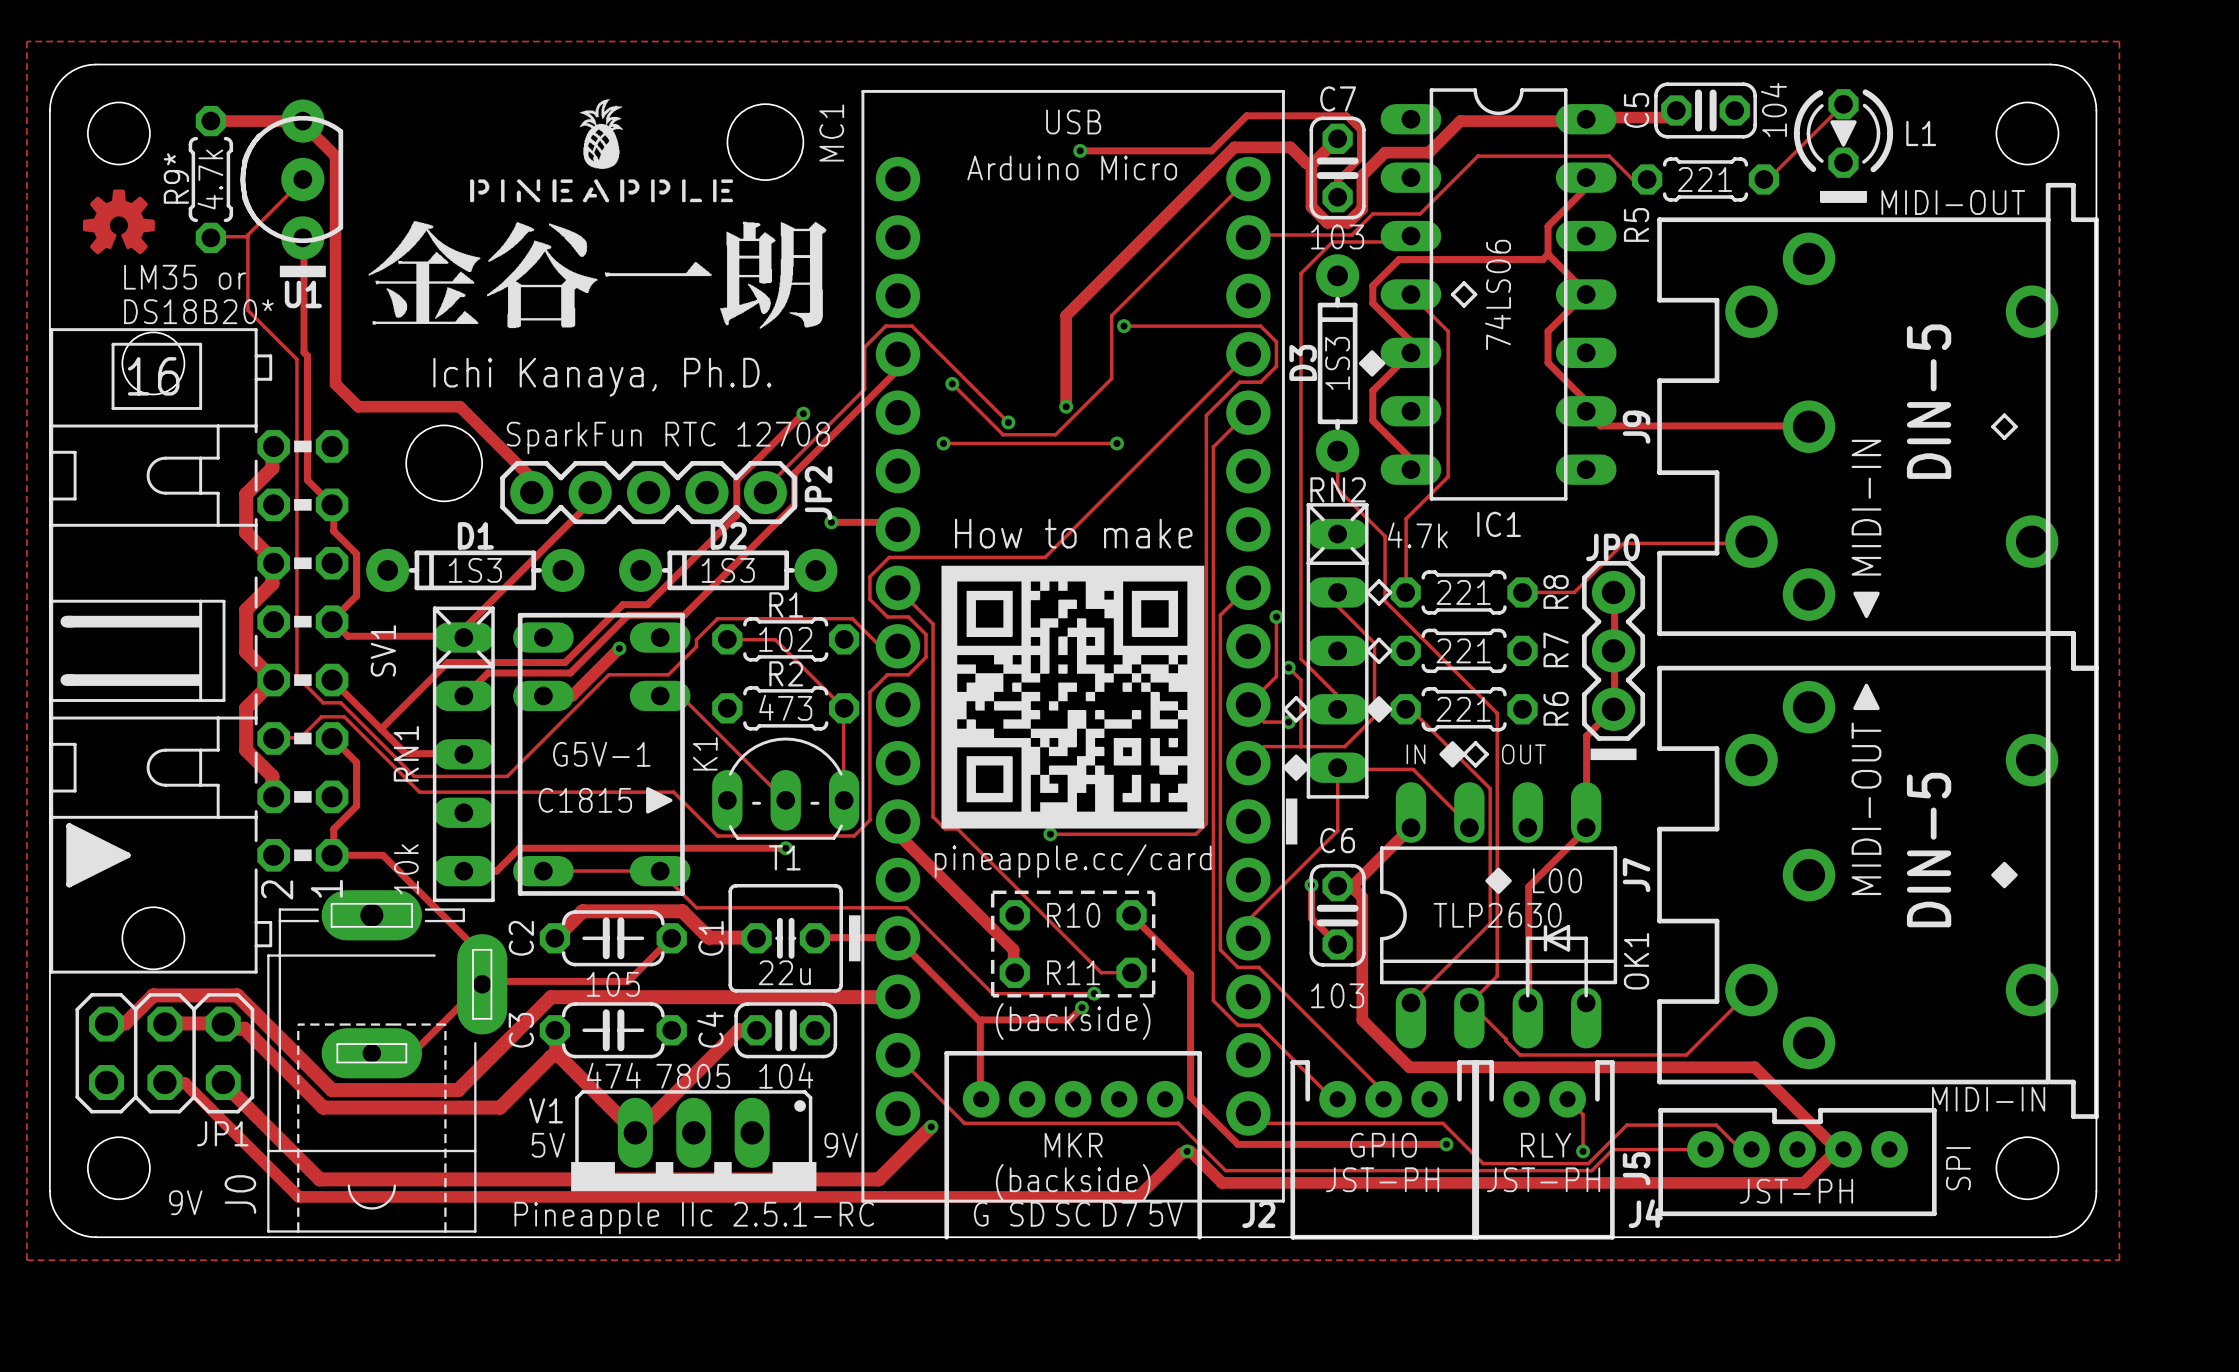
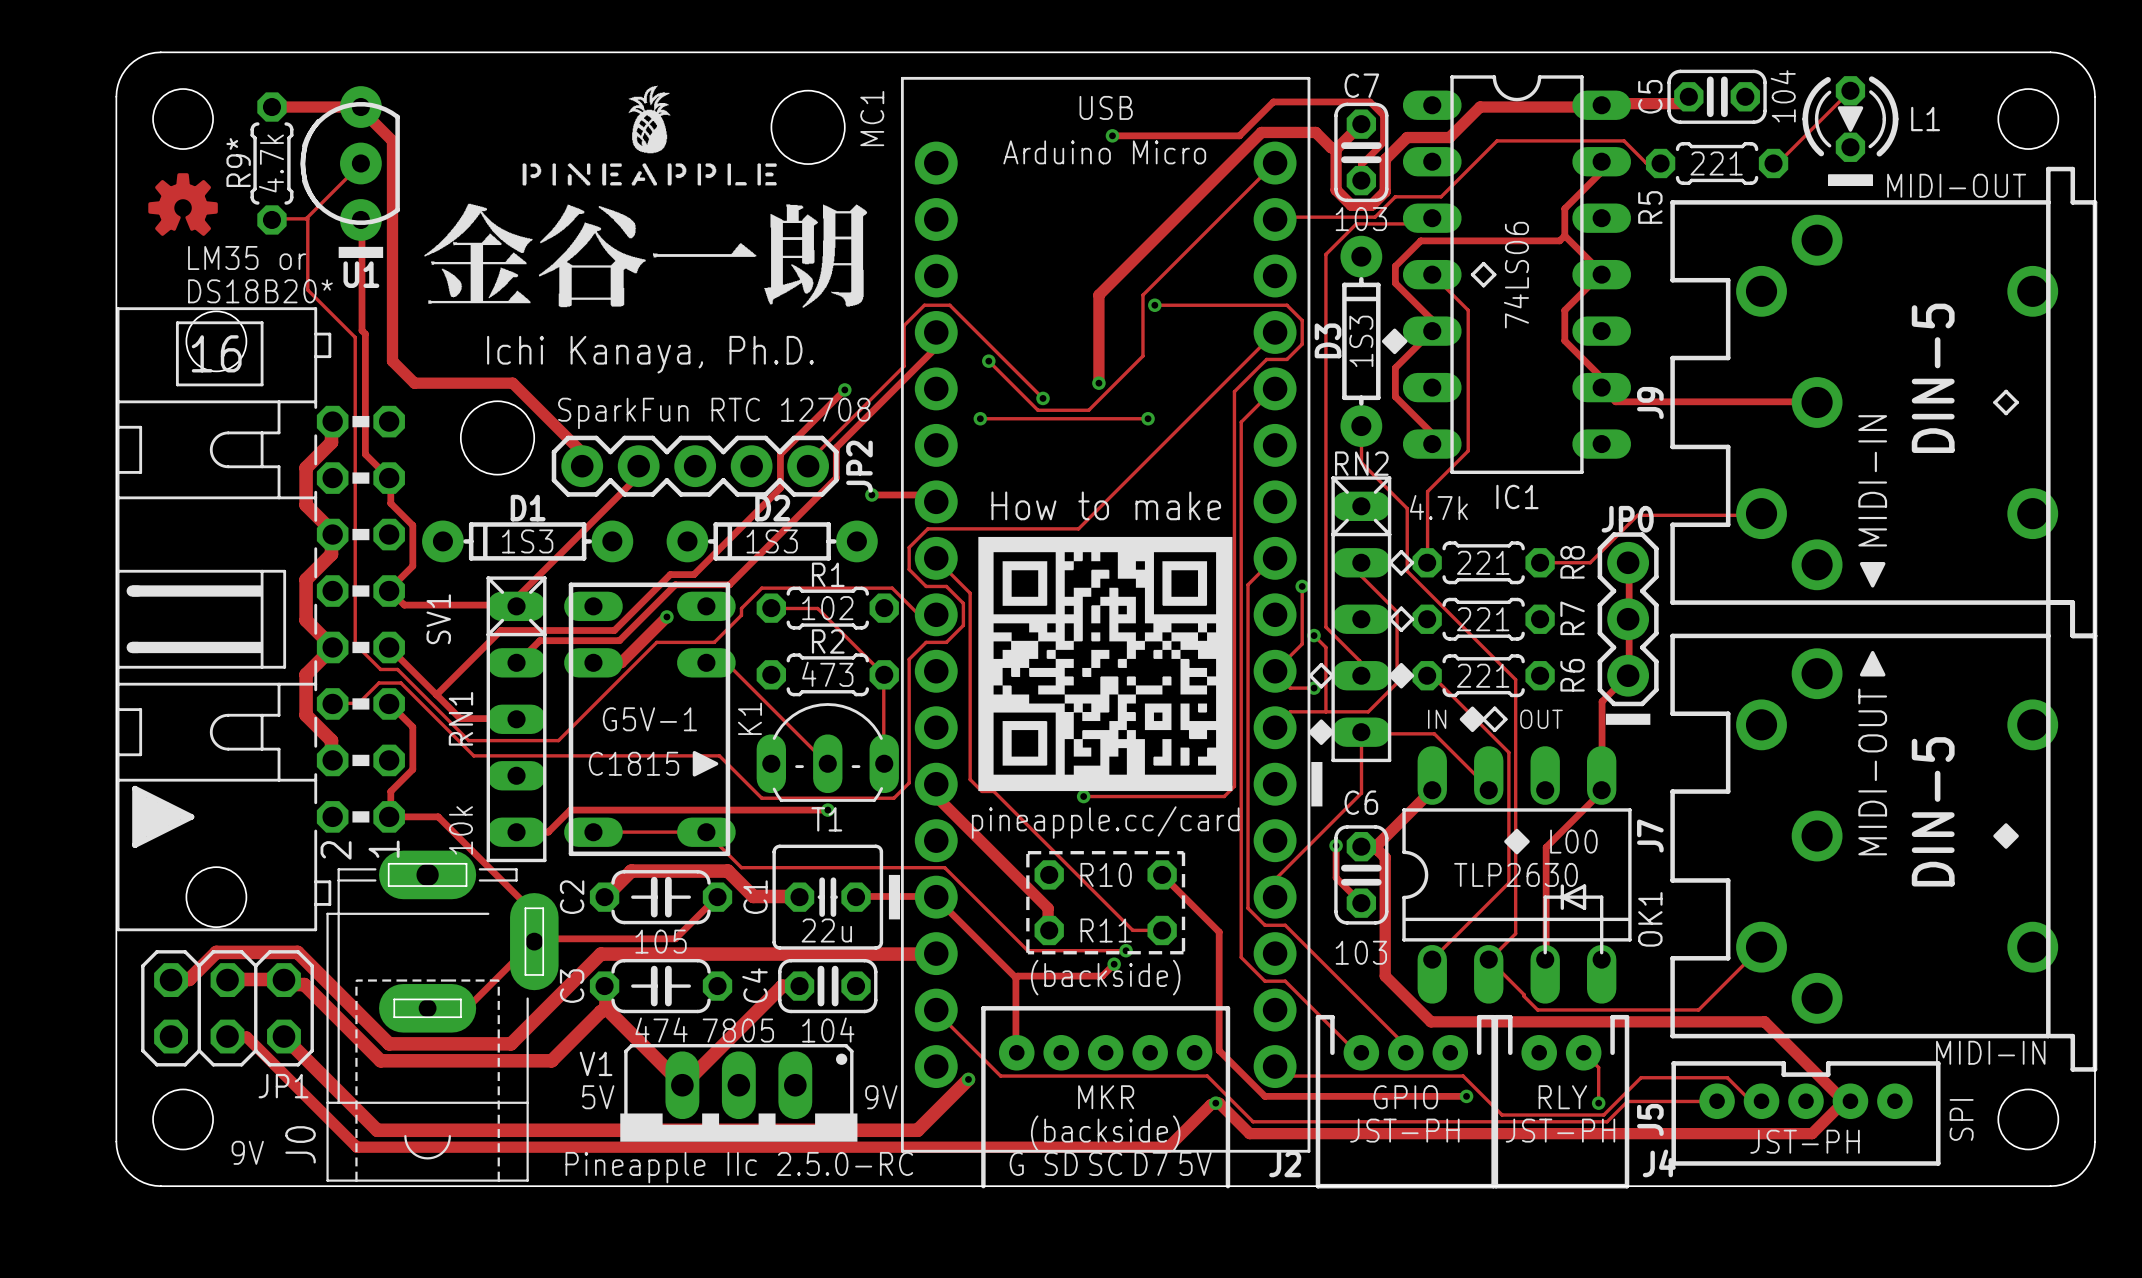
zone outline: (26, 41) (2119, 41) (2119, 1260) (26, 1260) (26, 41) -> none
text: Pineapple IIc 2.5.1-RC (694, 1218) -> Pineapple IIc 2.5.0-RC (739, 1167)

